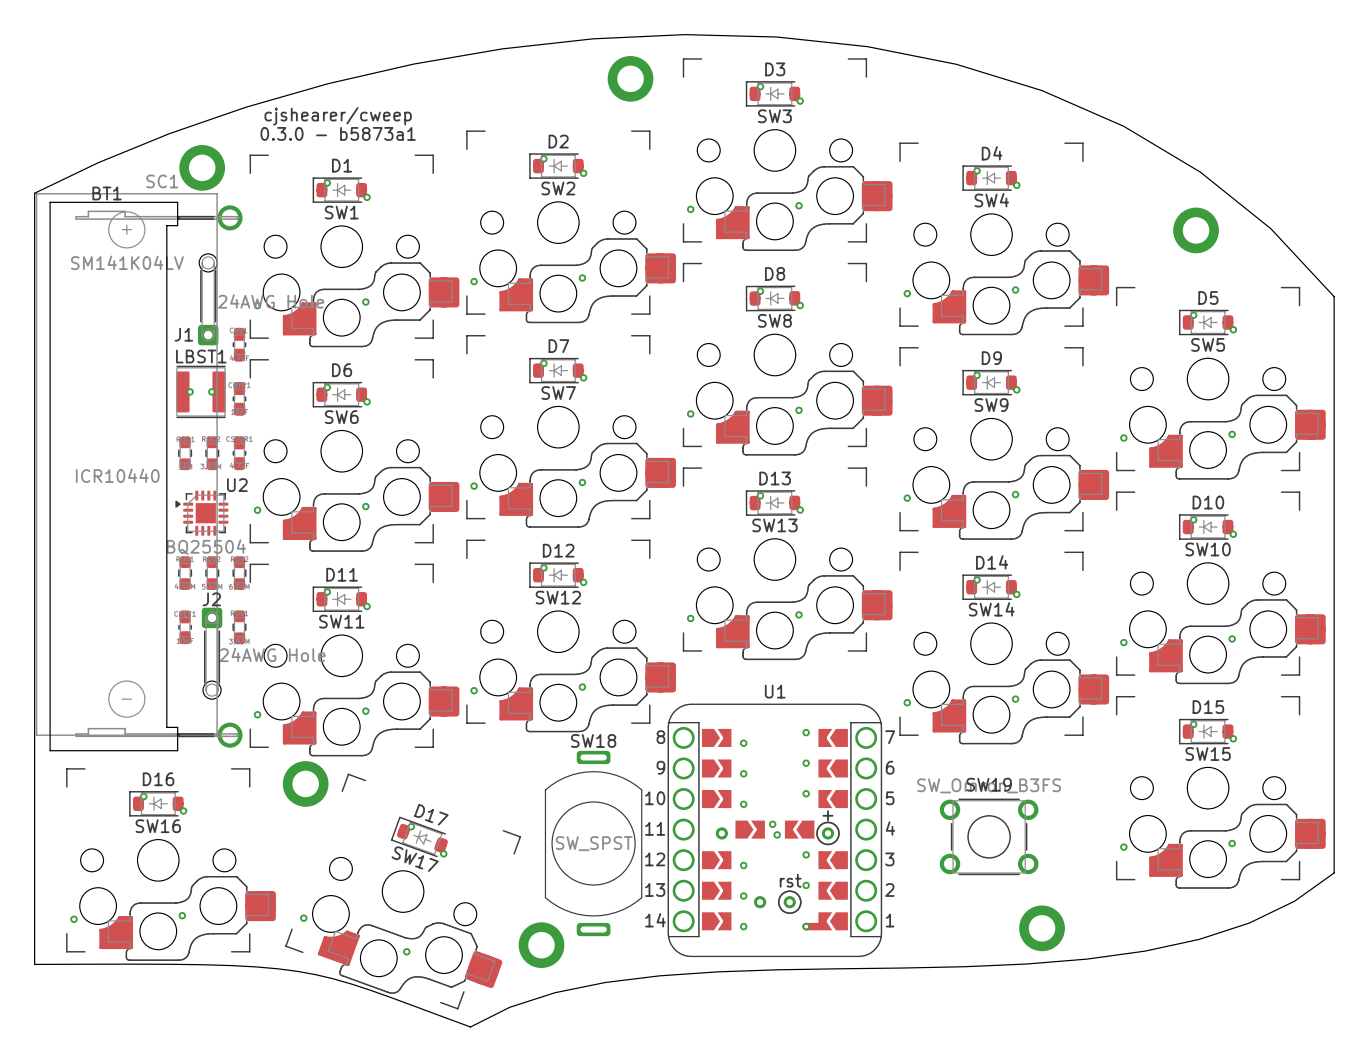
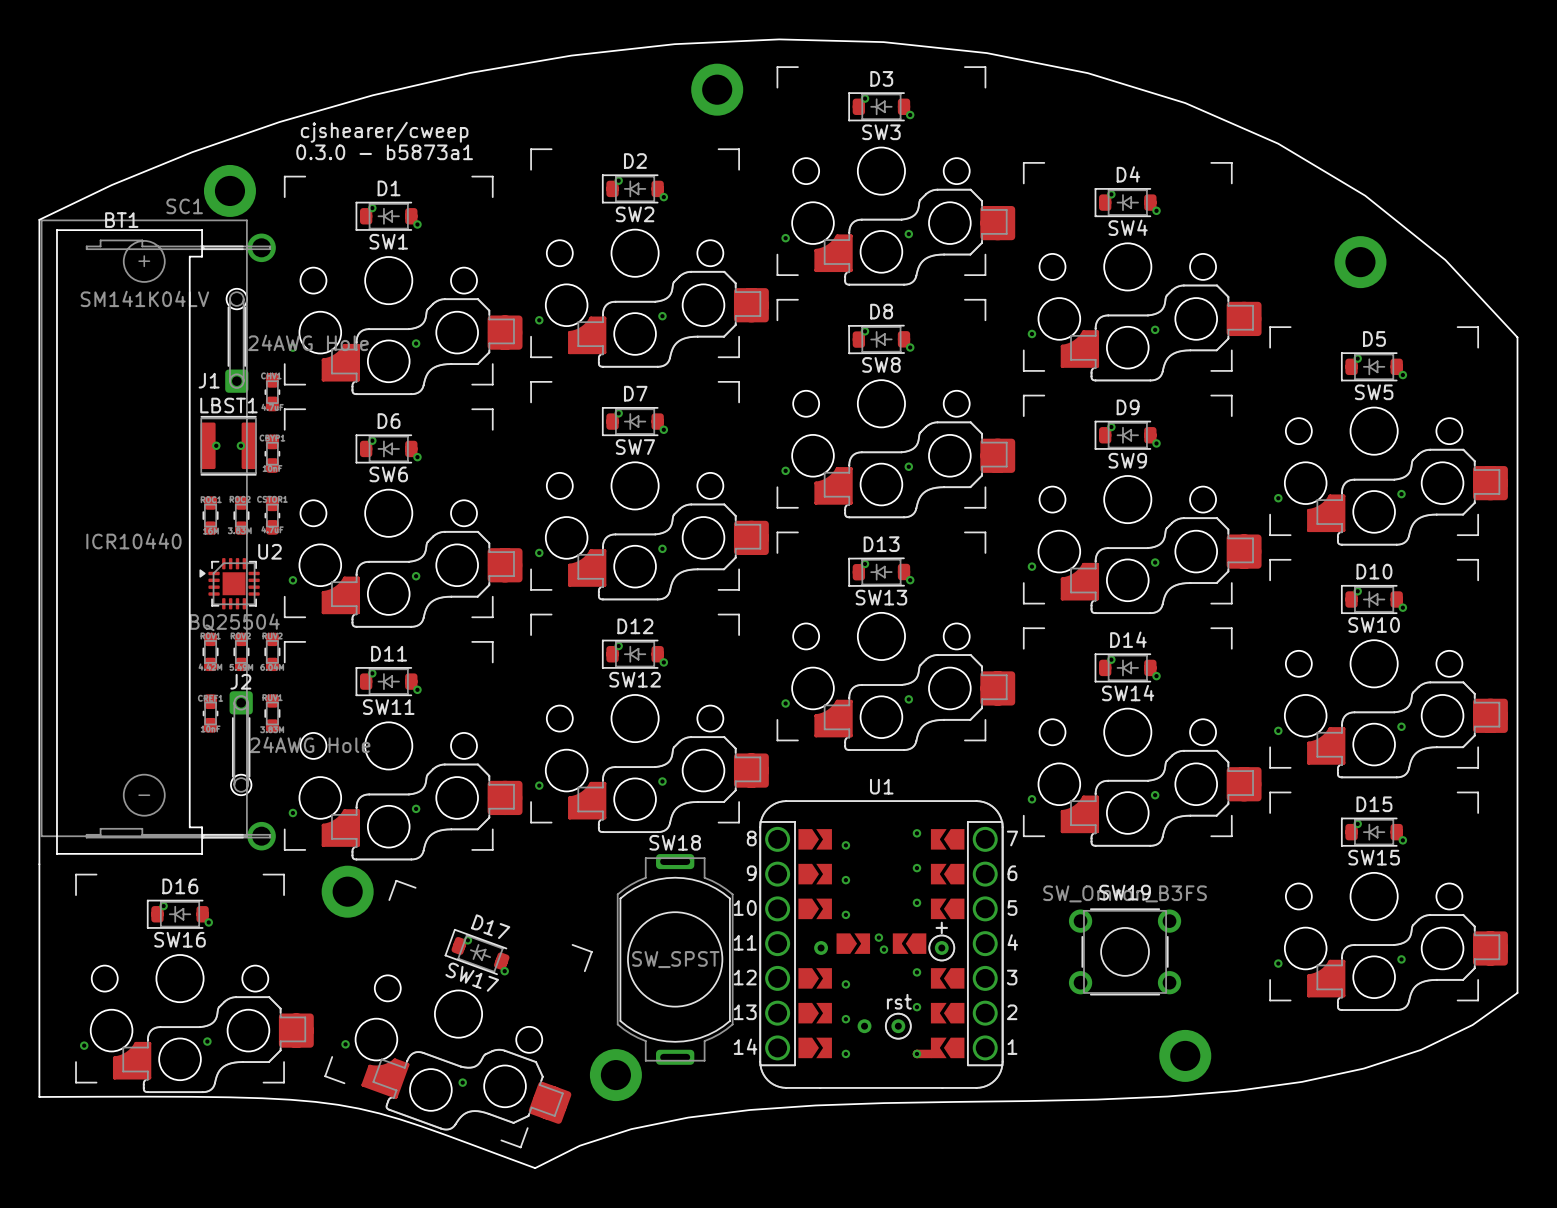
SW18 footprint: [544, 750, 643, 937] -> [617, 854, 733, 1065]

